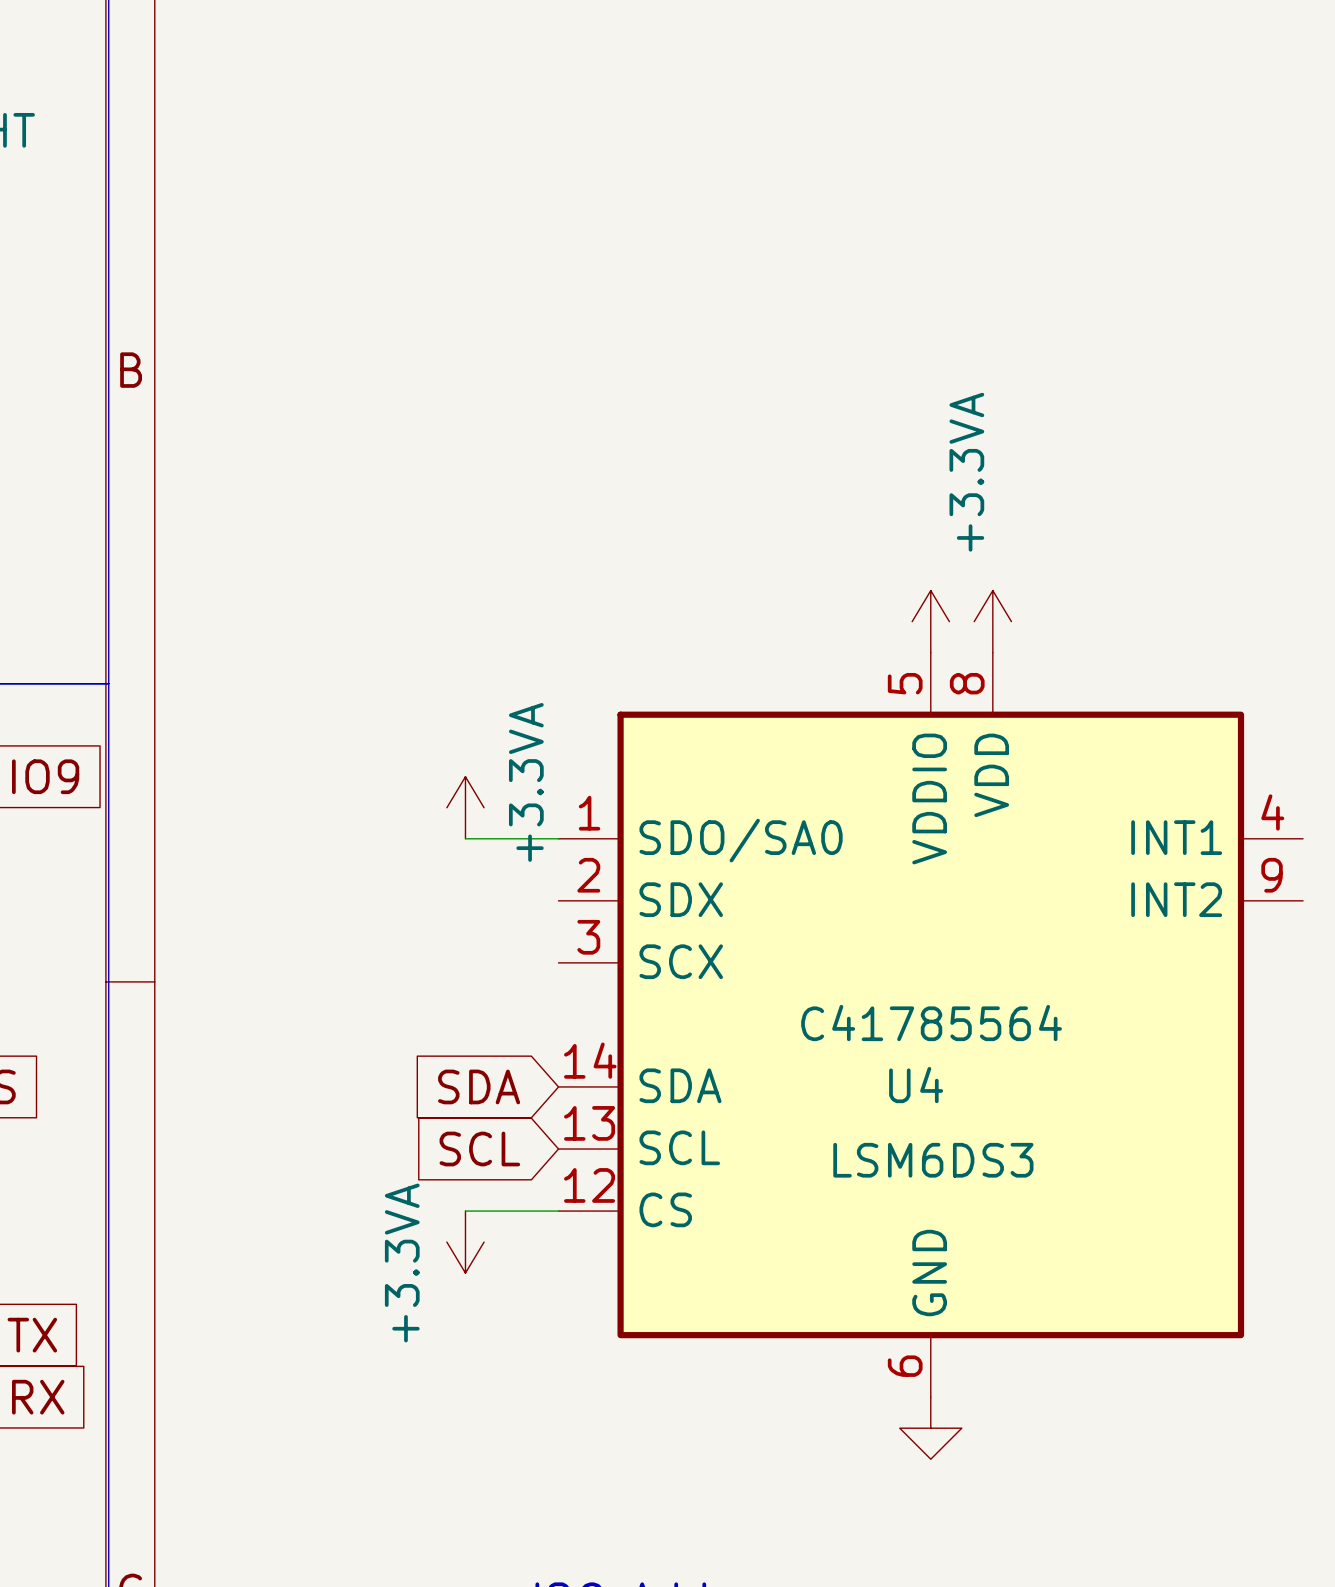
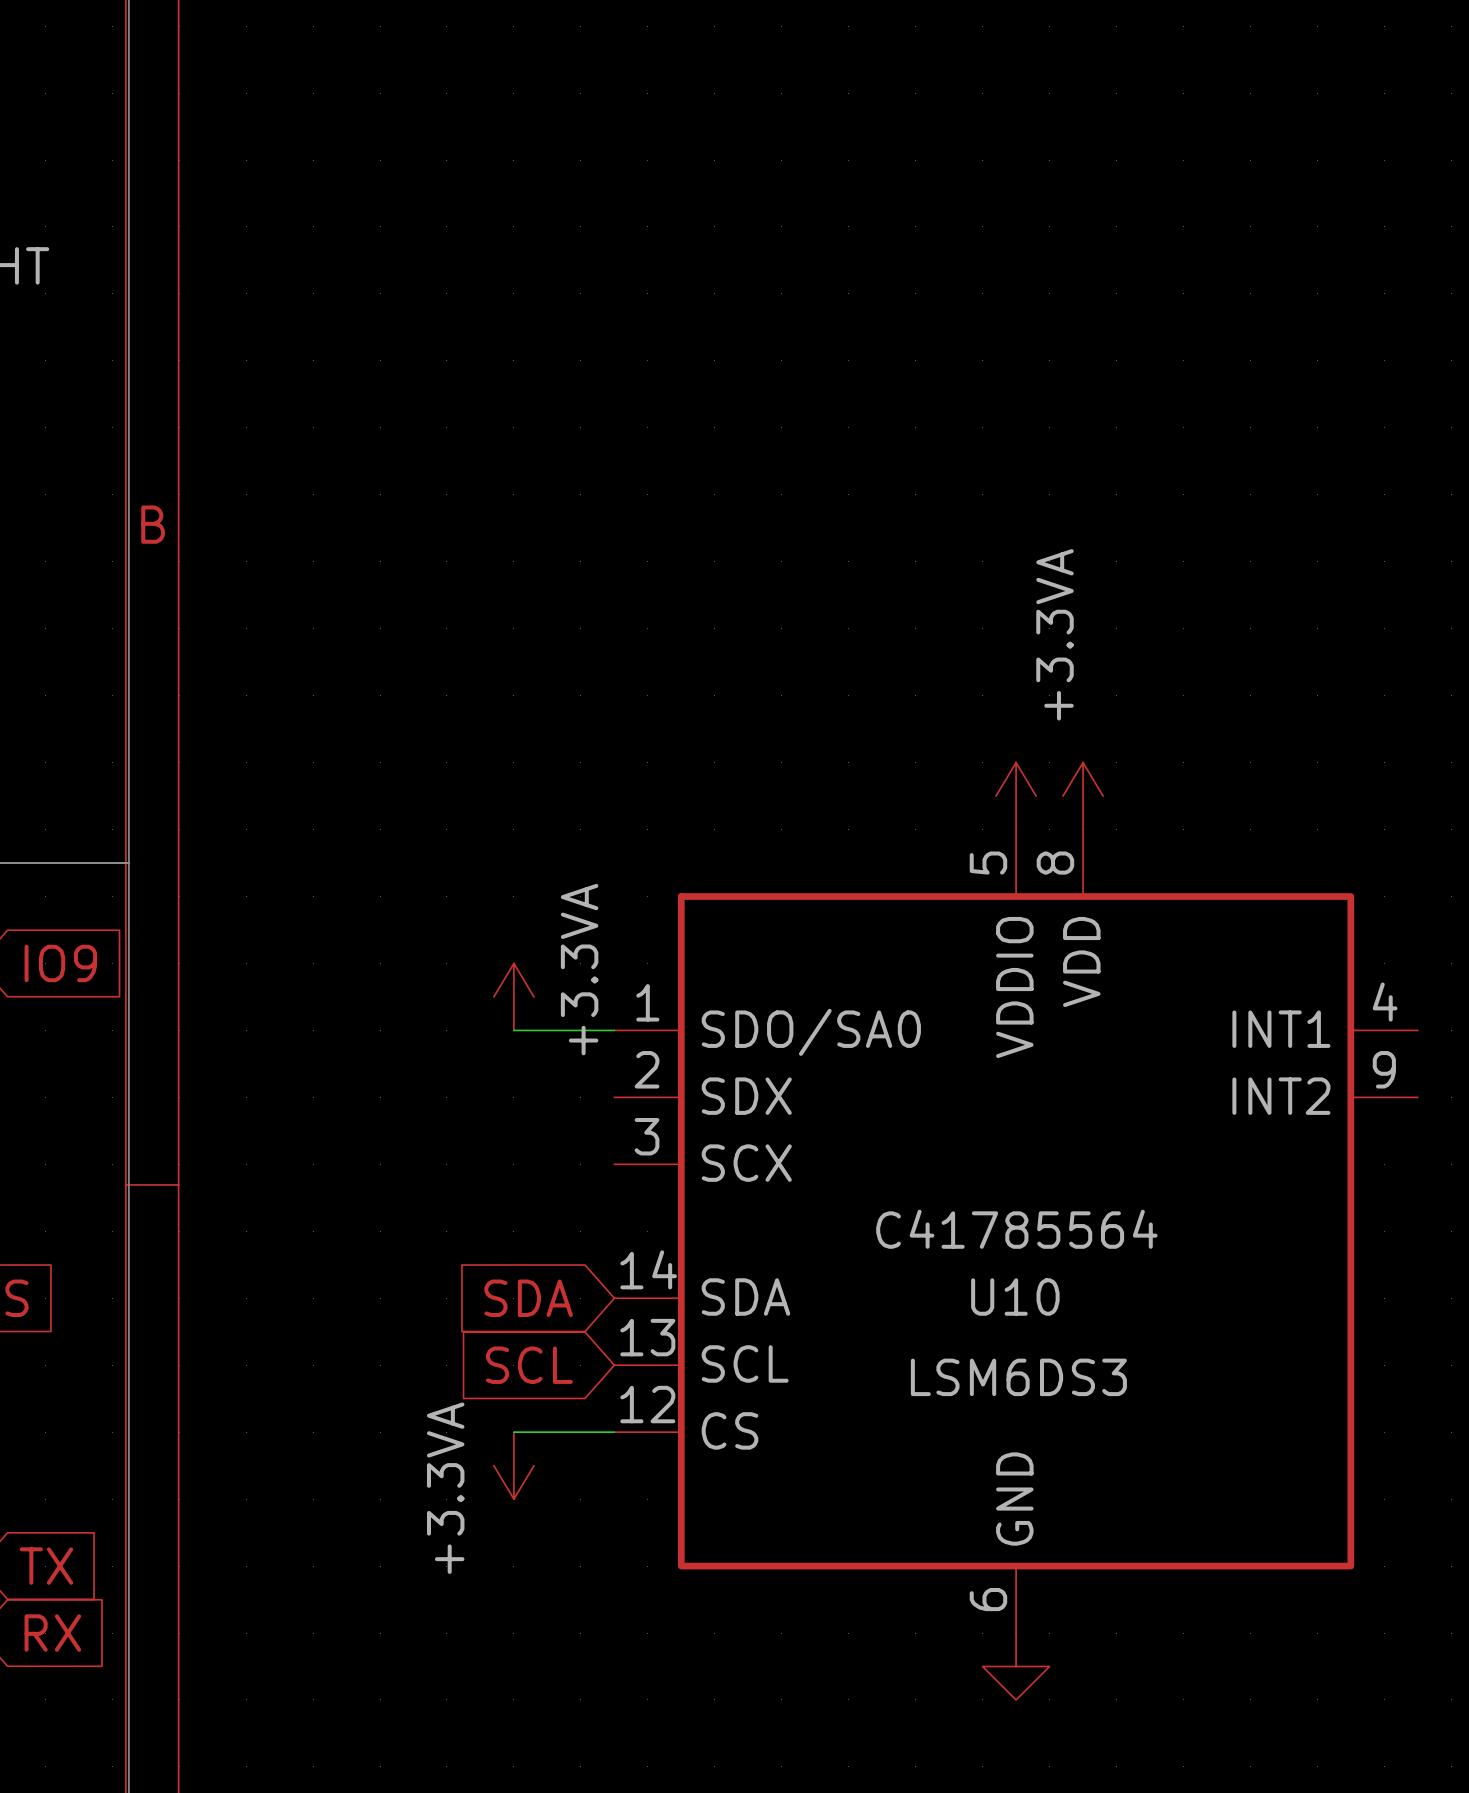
U4 name: U4 (916, 1085) -> U10 (1015, 1297)

